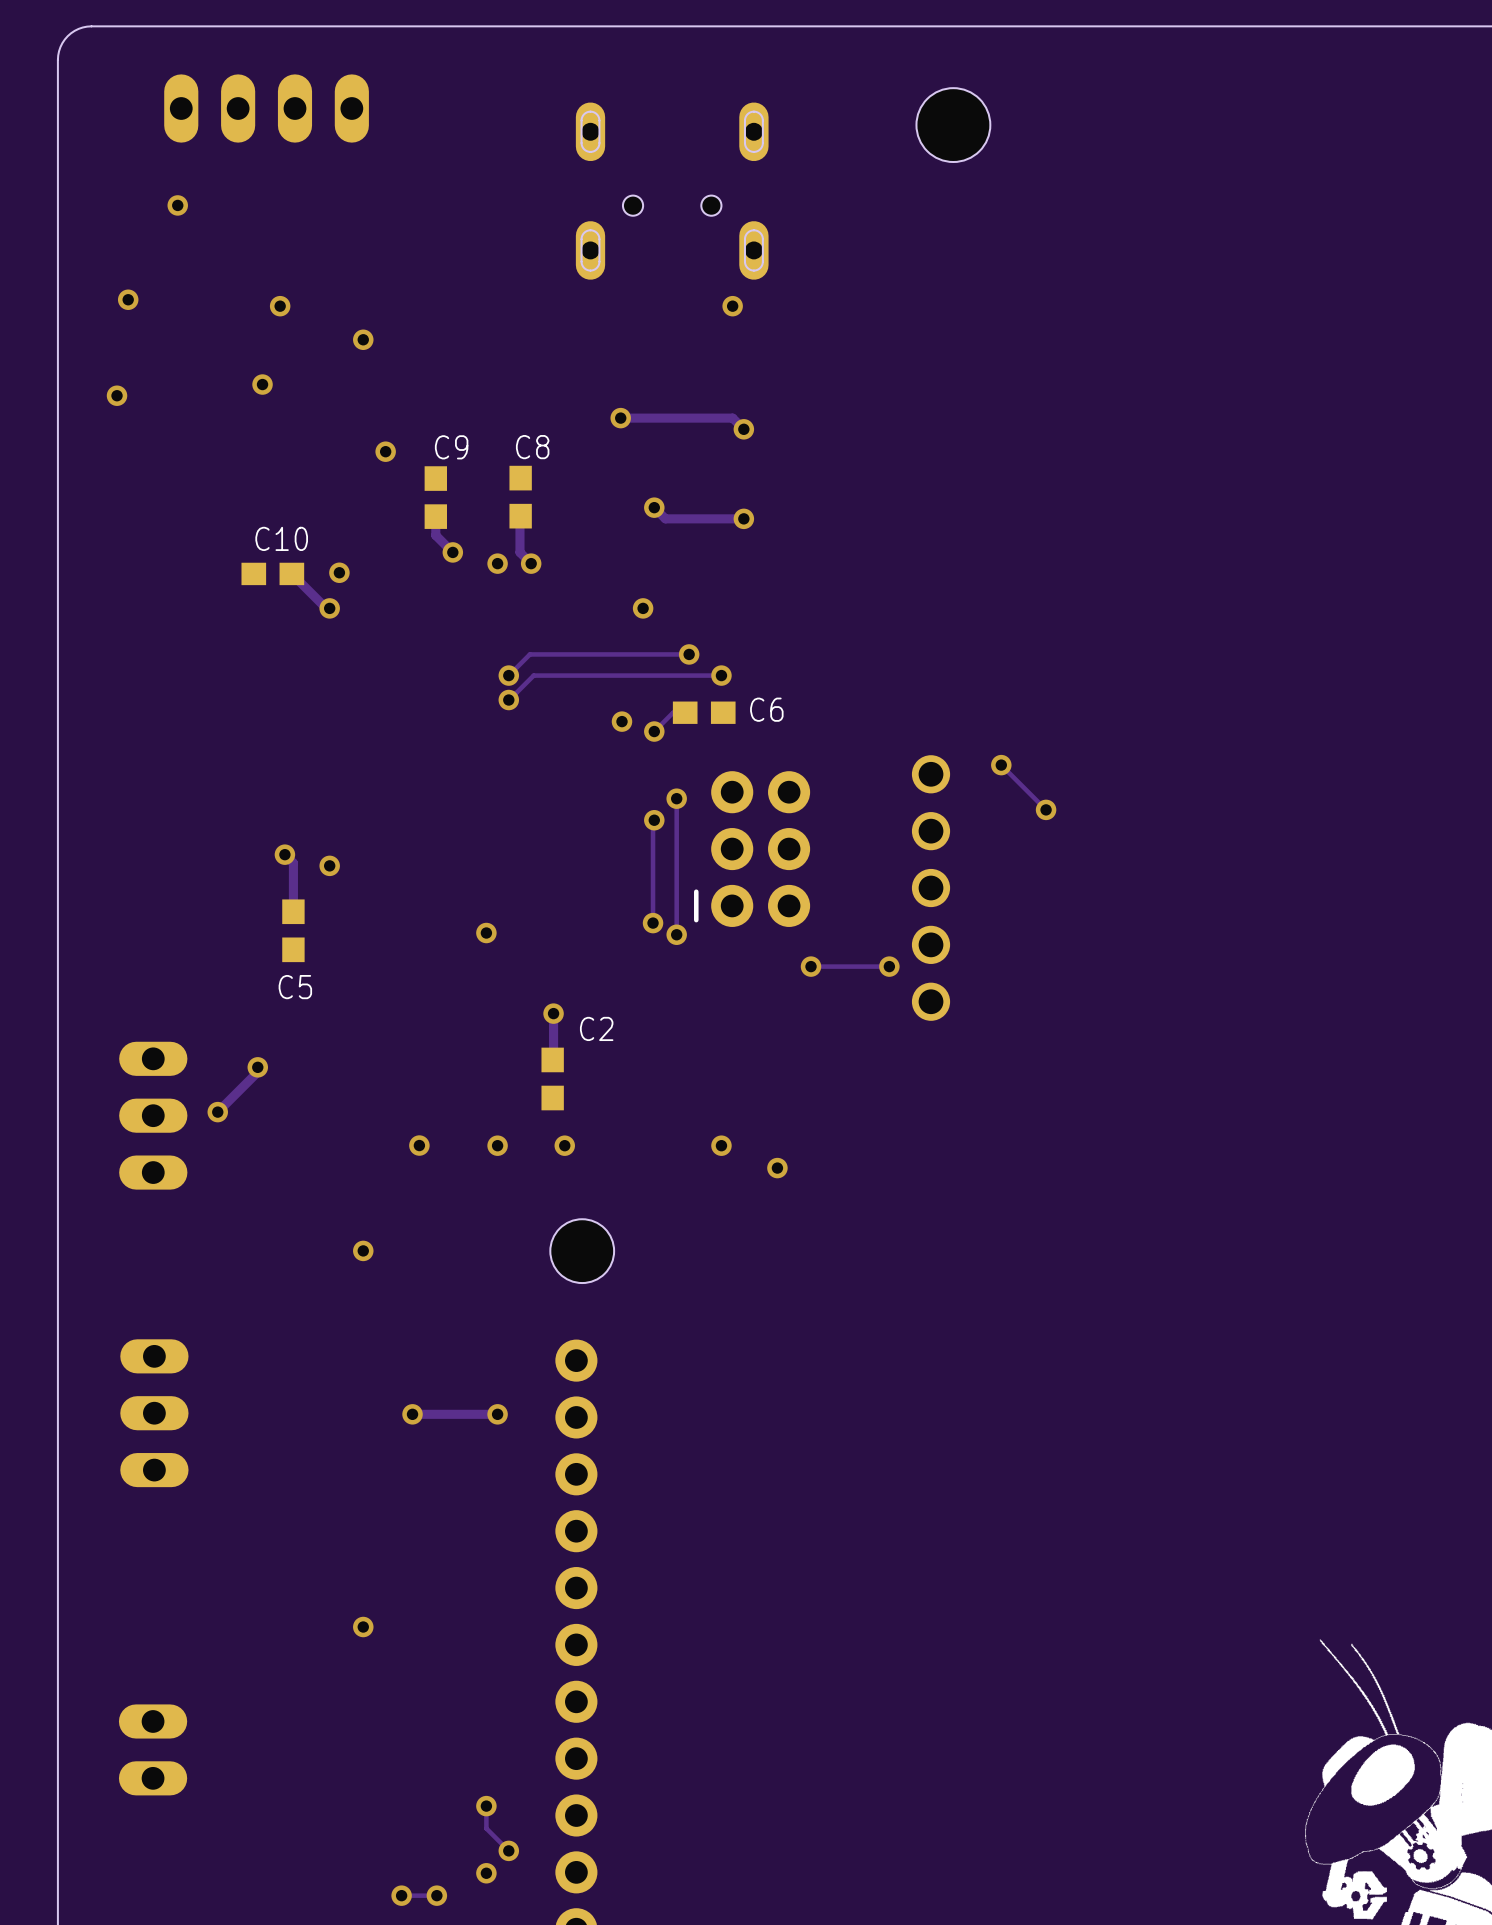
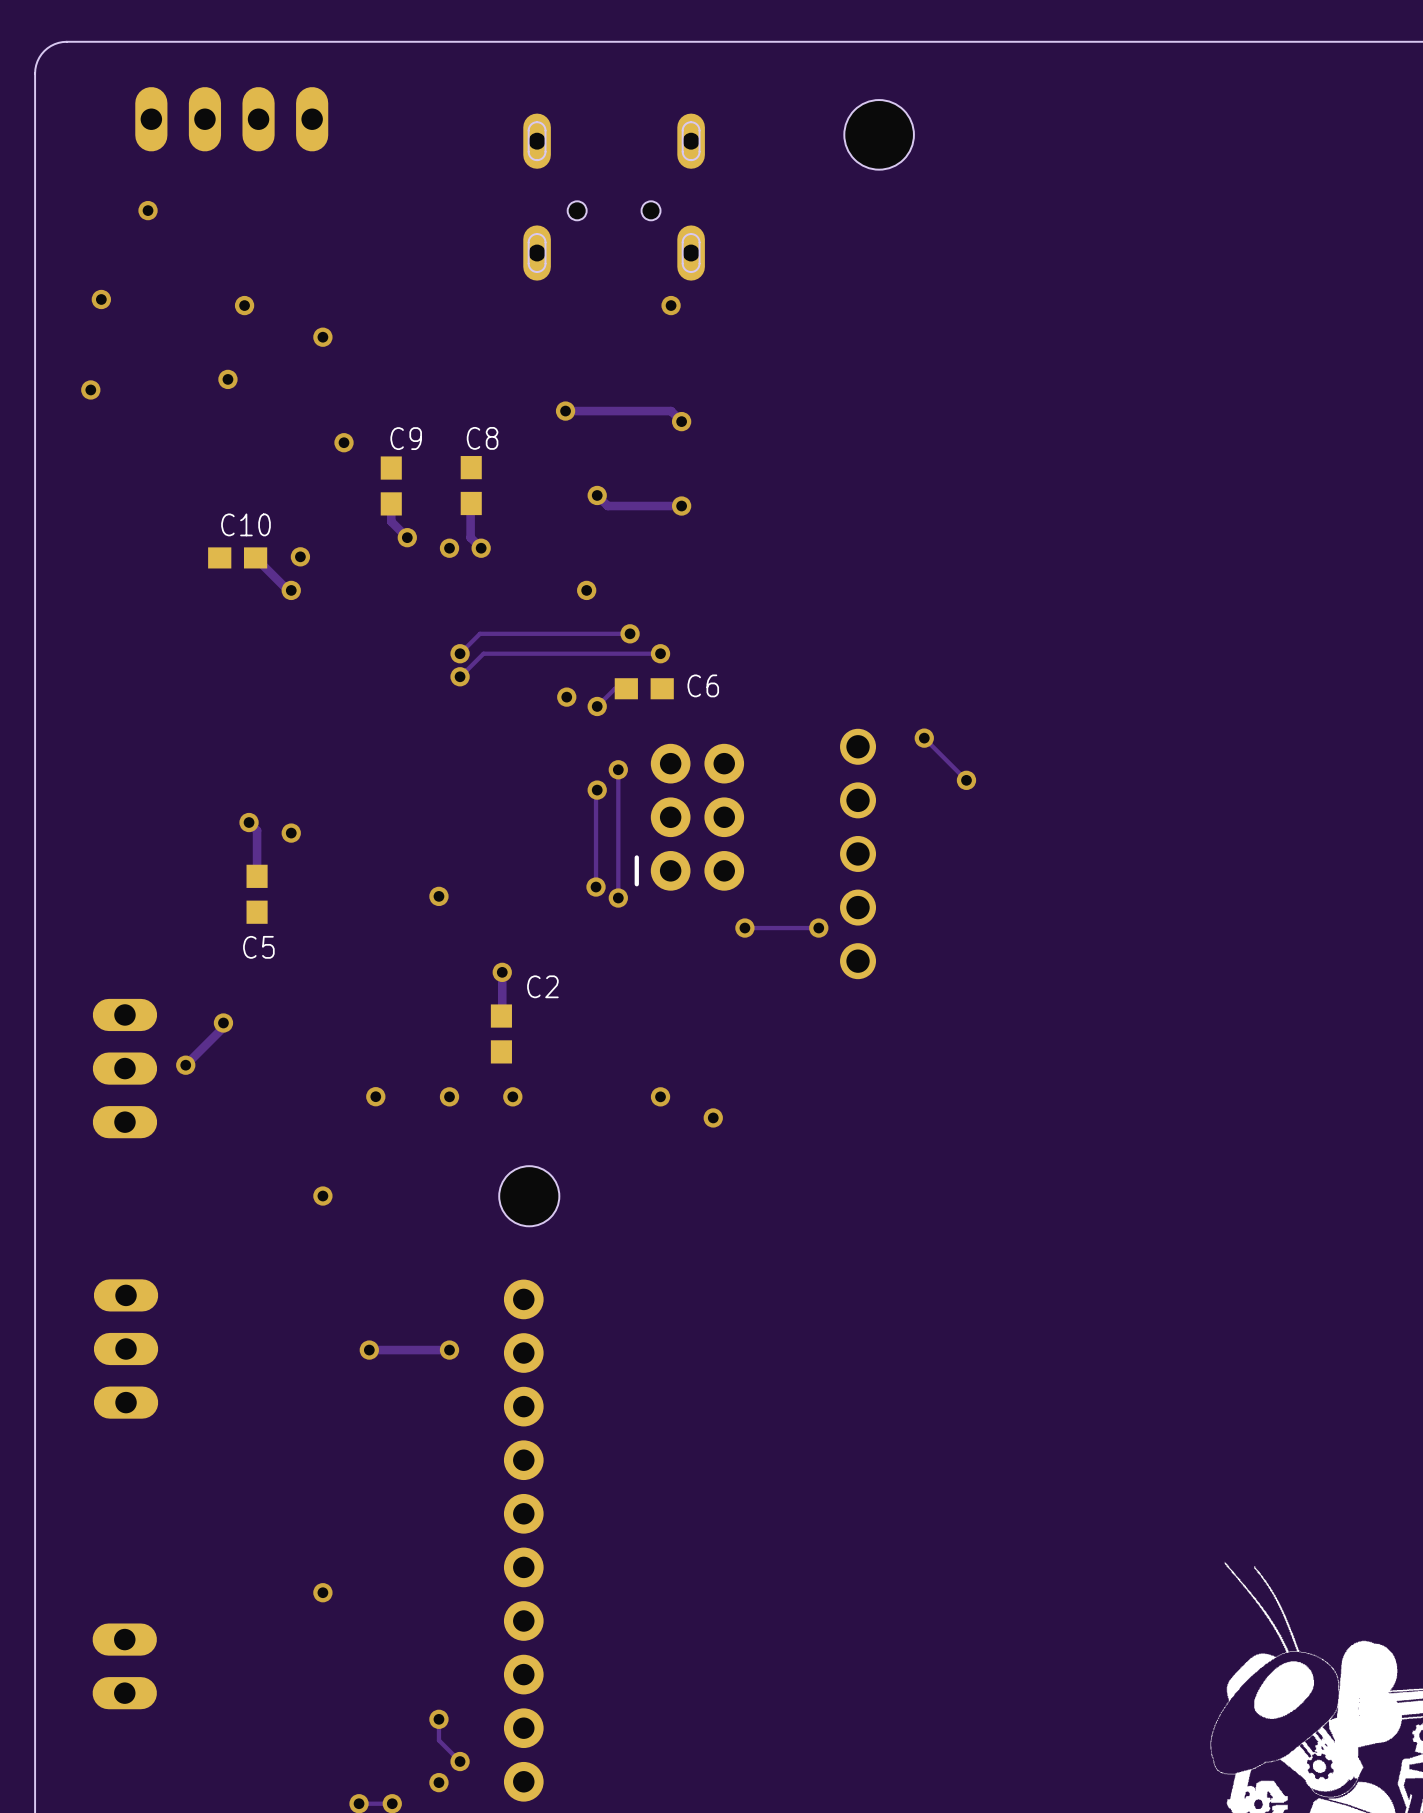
via position: (363, 1627) -> (322, 1592)

